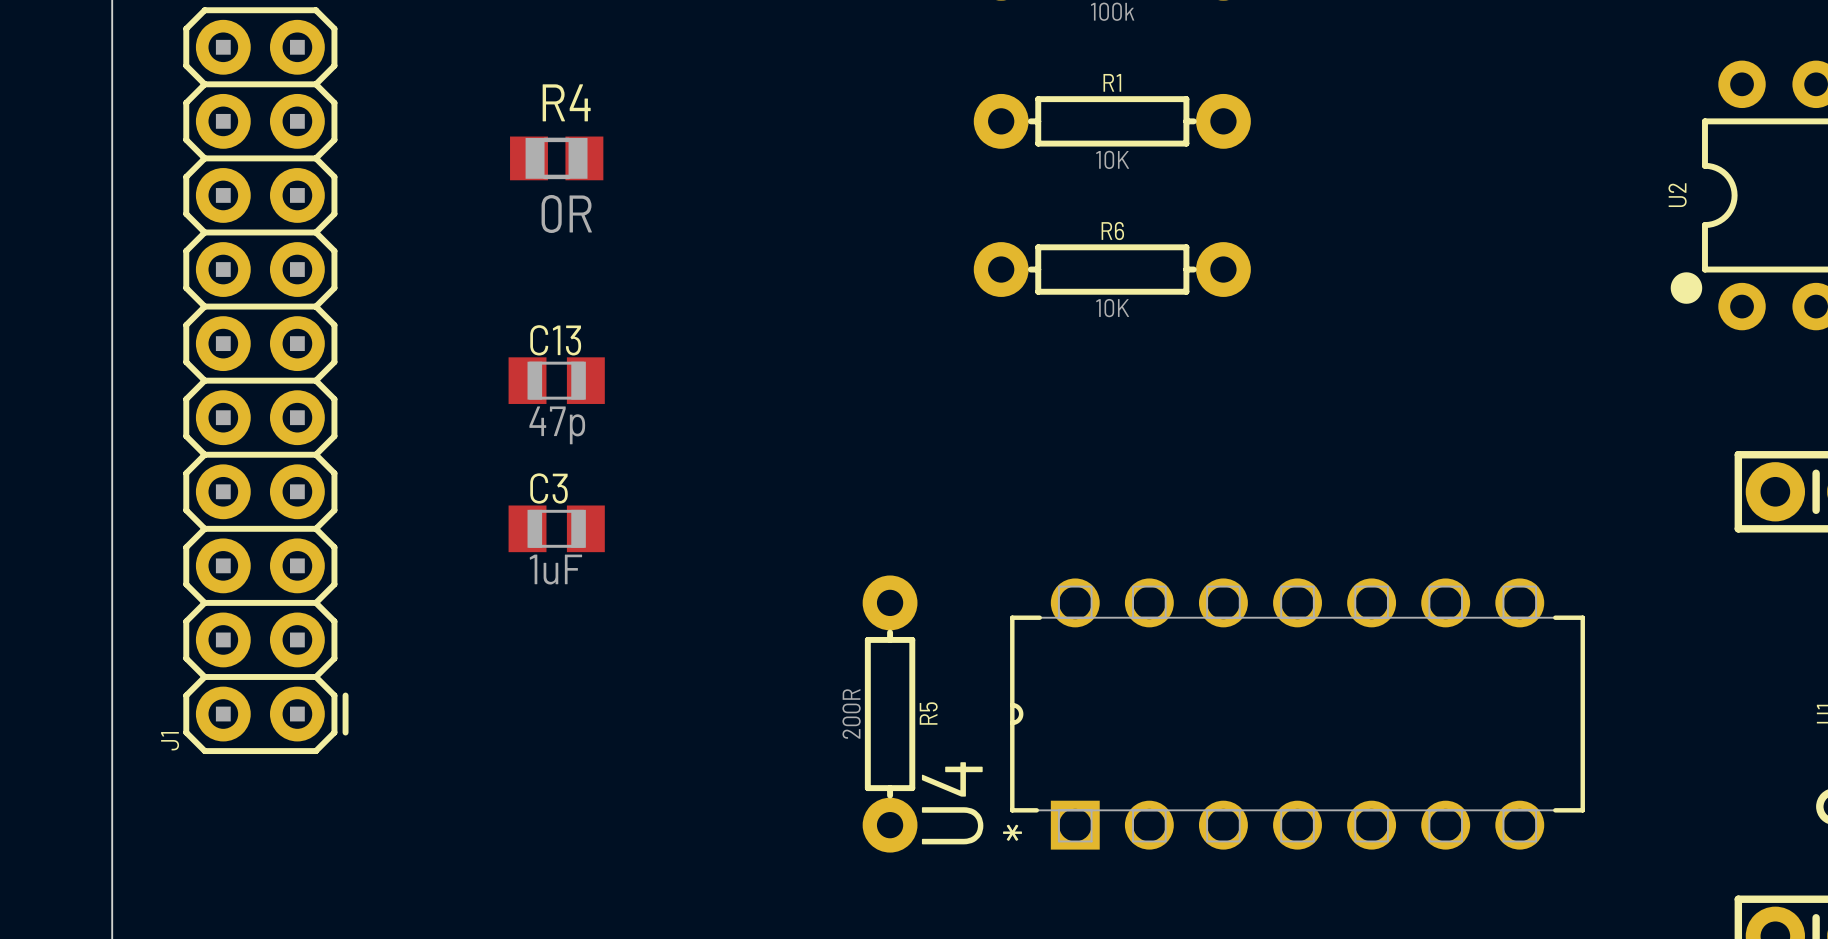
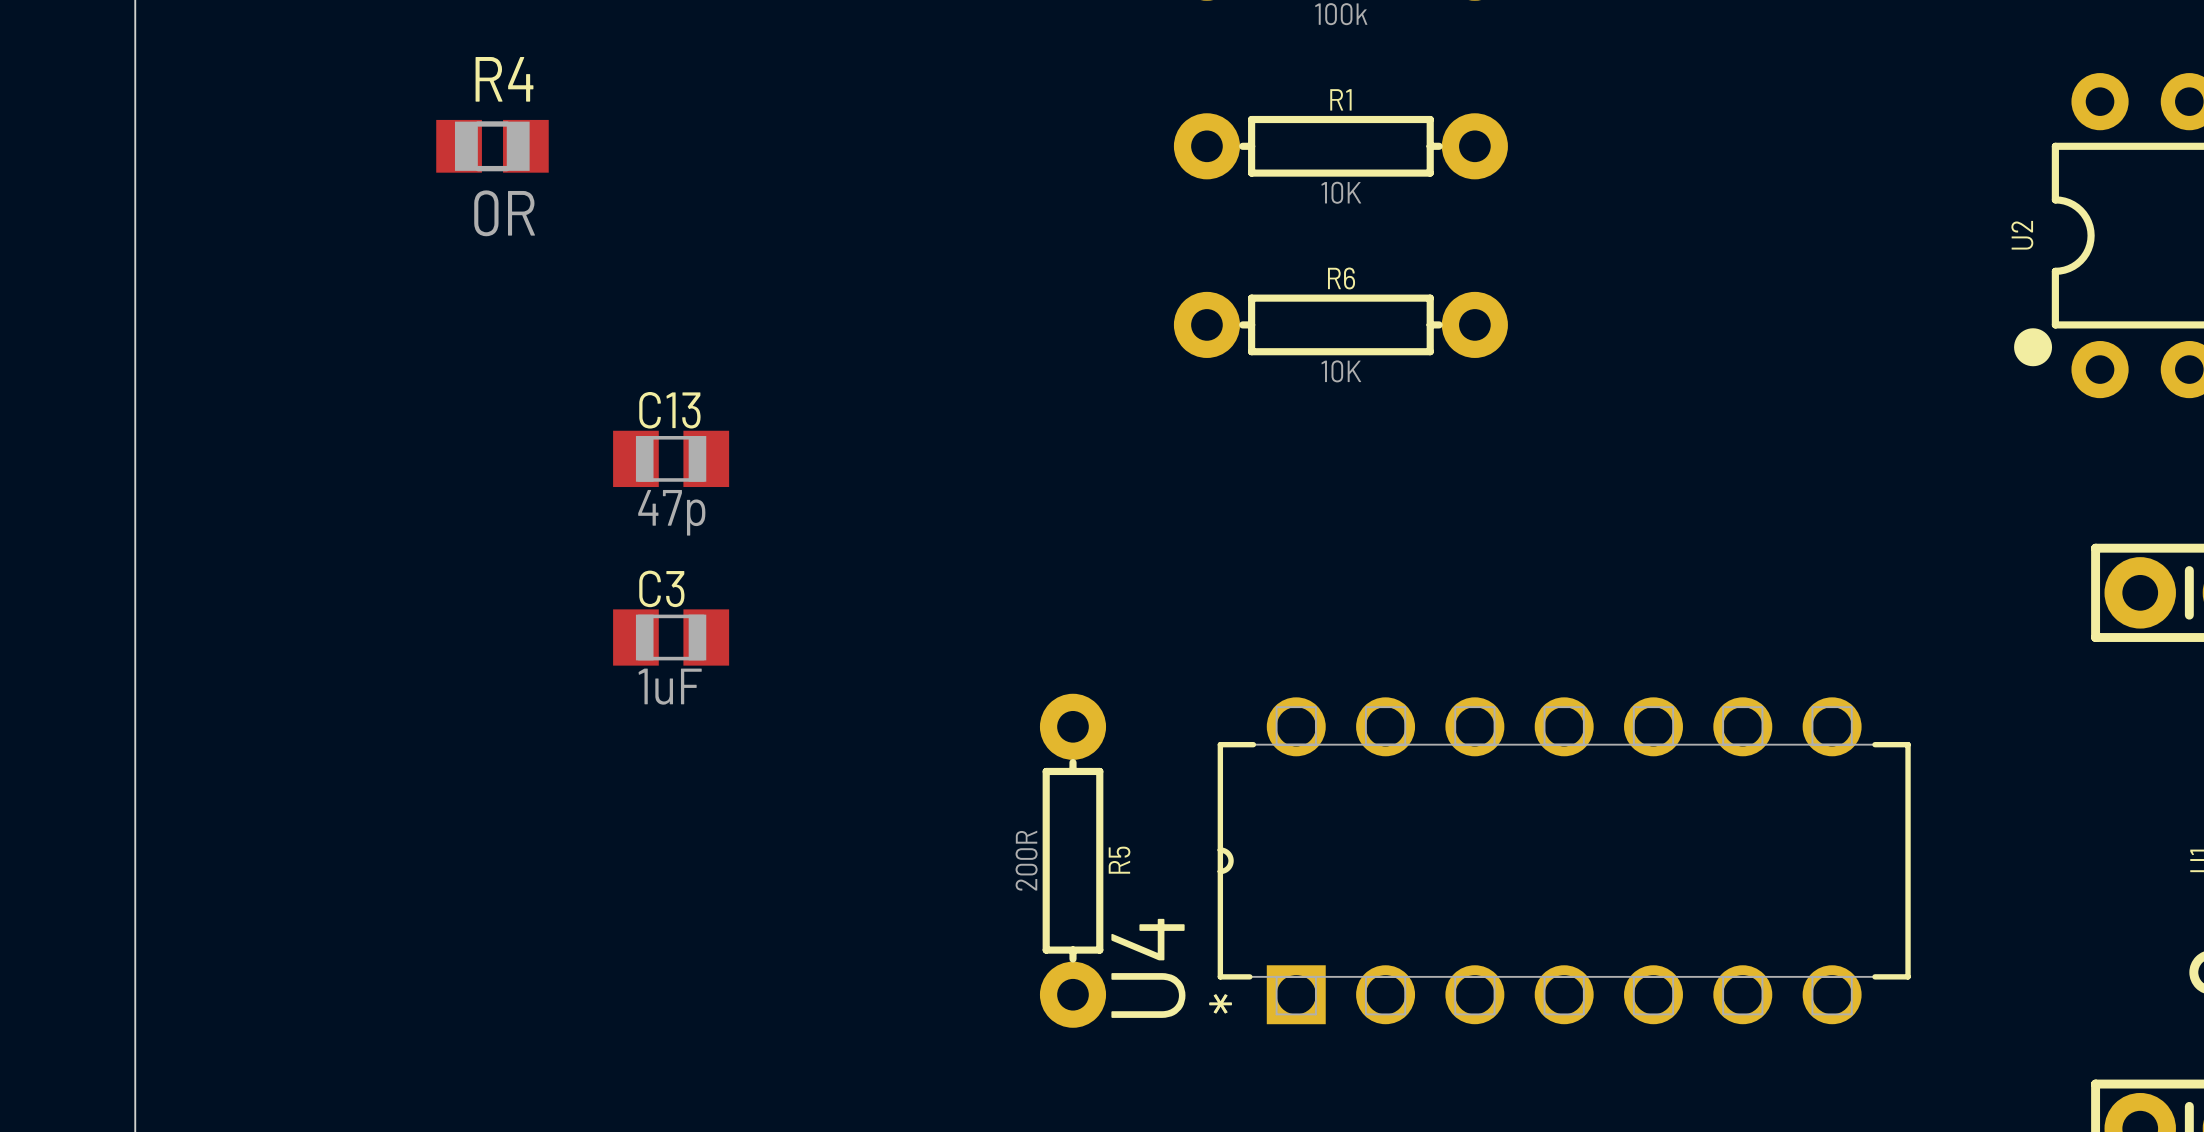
R4 position: (556, 158) -> (492, 146)
J1: (265, 380) -> none

